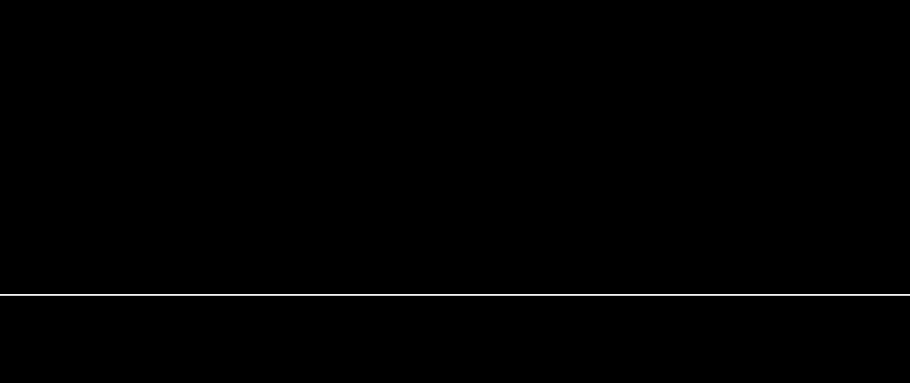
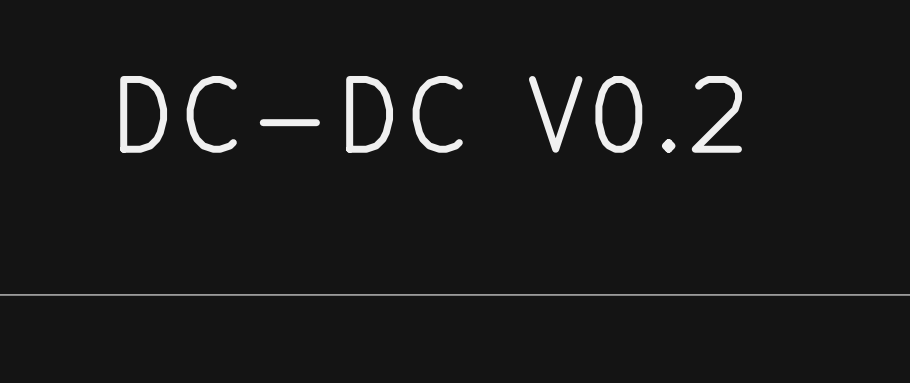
text: none -> DC-DC V0.2 (431, 114)

